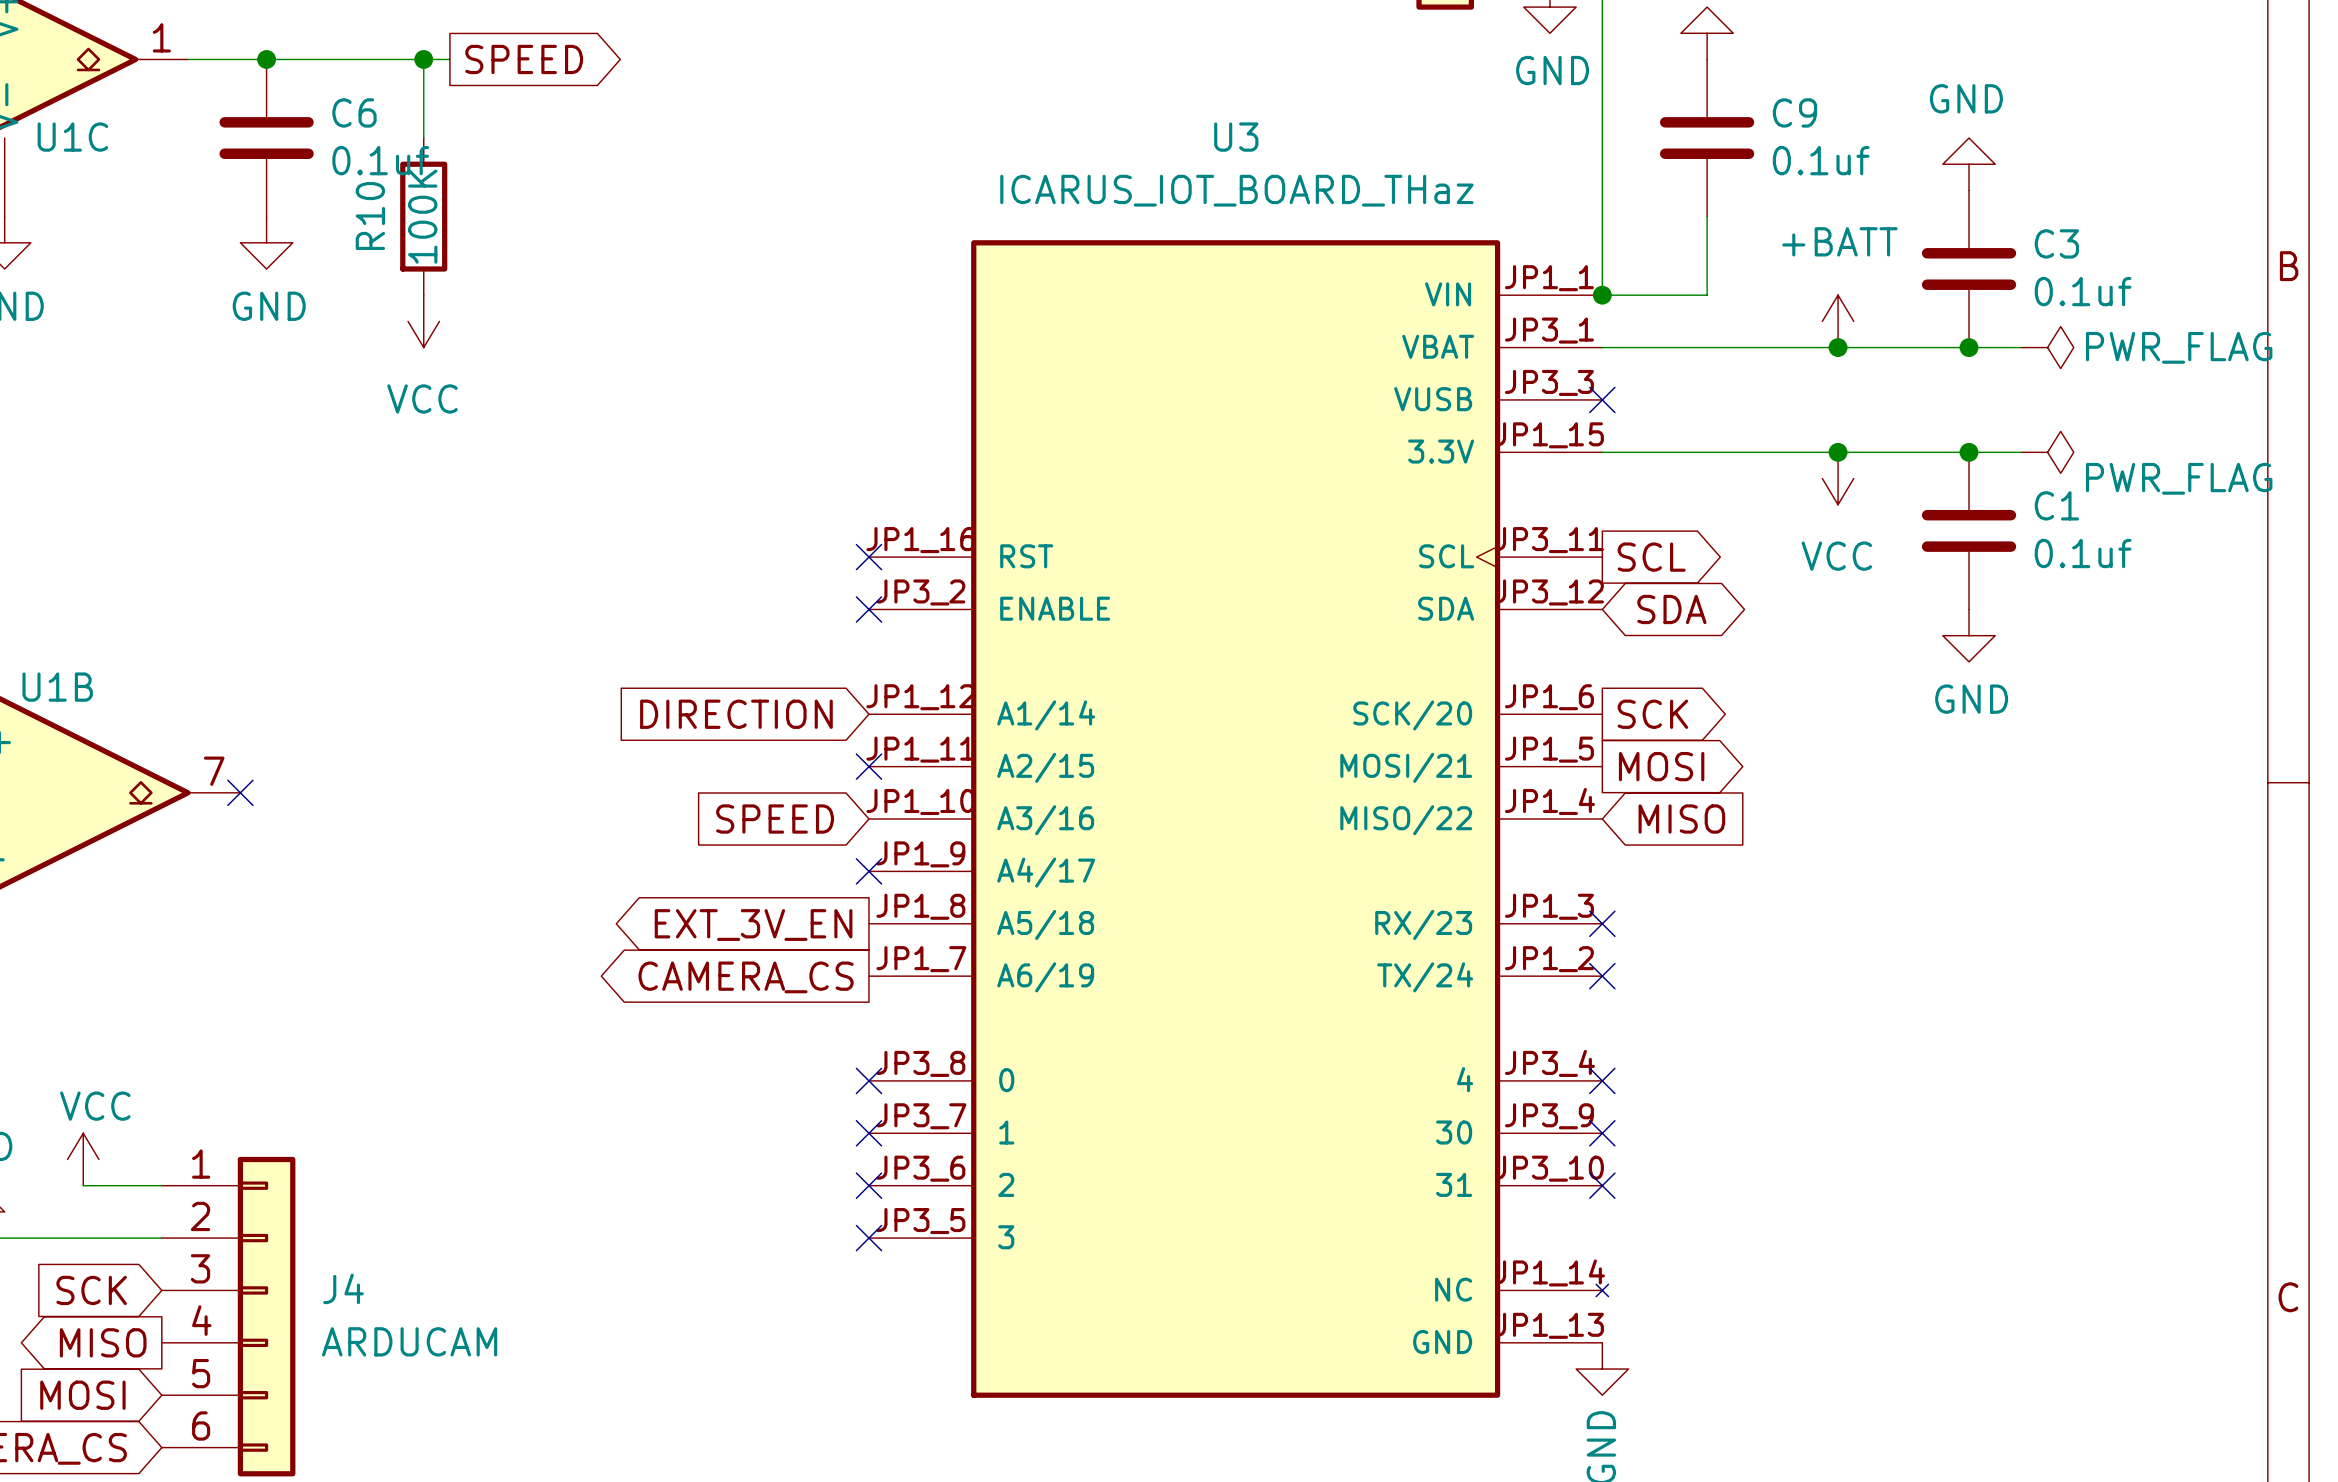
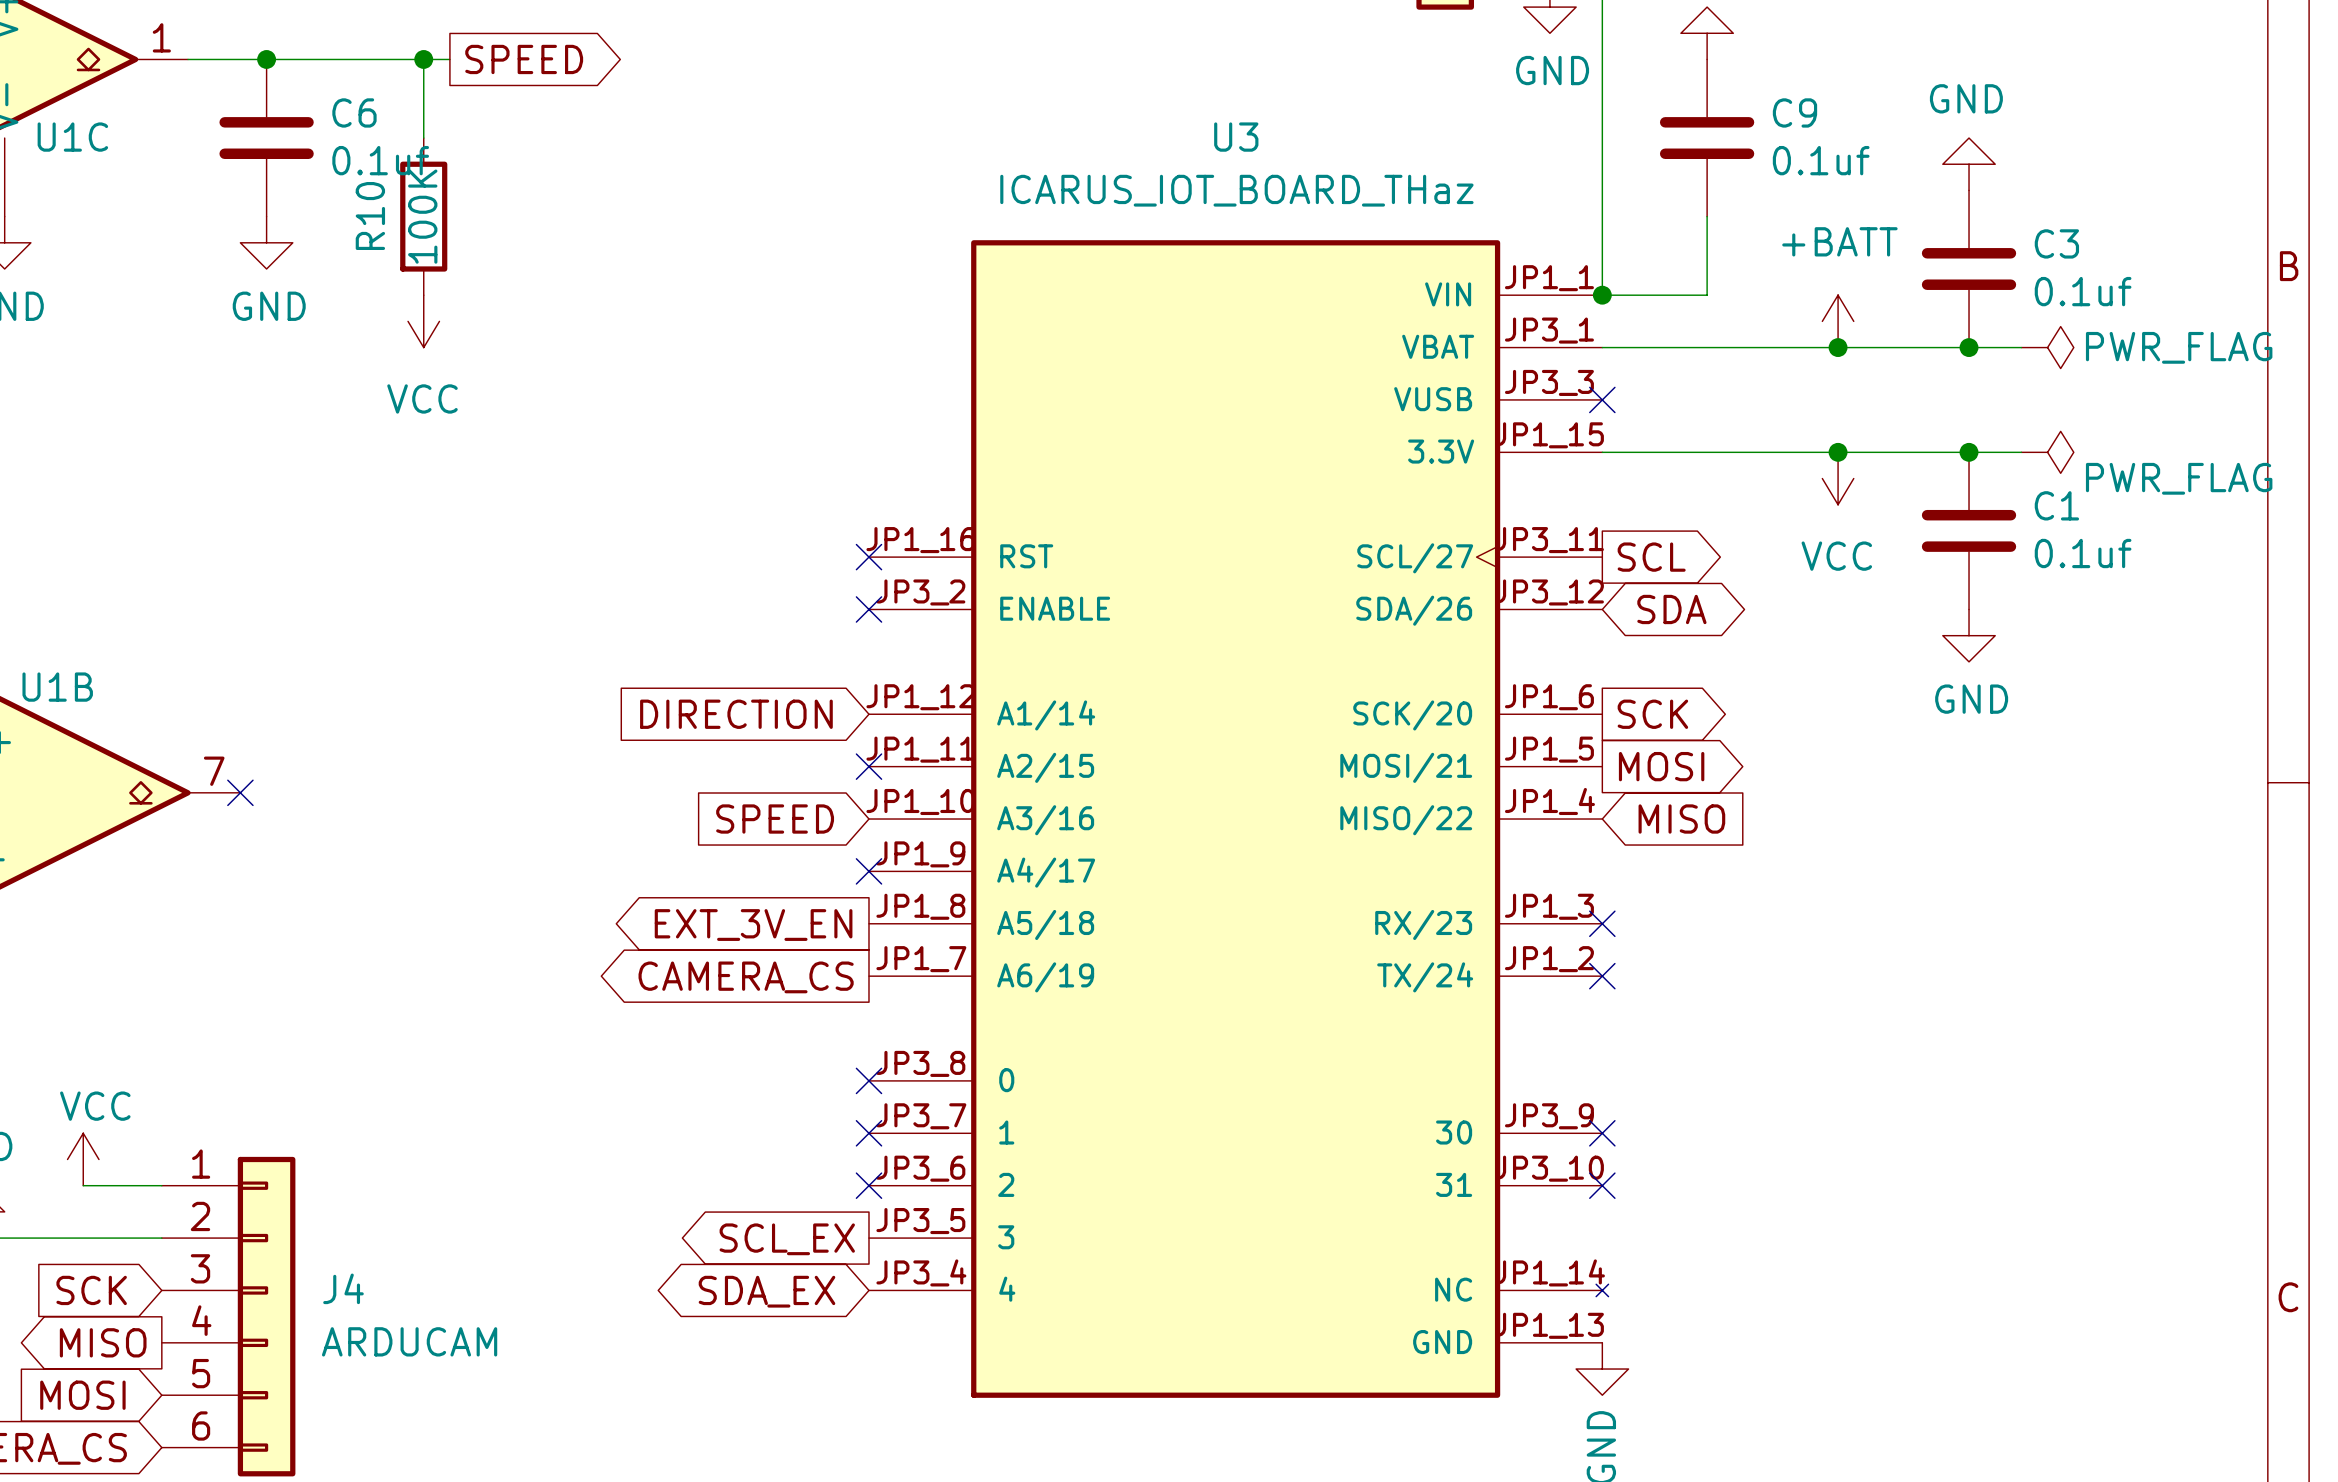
U3 symbol: [868, 240, 1609, 1398] -> [868, 240, 1609, 1398]
no-connect mark: (1602, 1080) -> none
no-connect mark: (868, 1238) -> none
global label: none -> SCL_EX (787, 1239)
global label: none -> SDA_EX (766, 1291)

